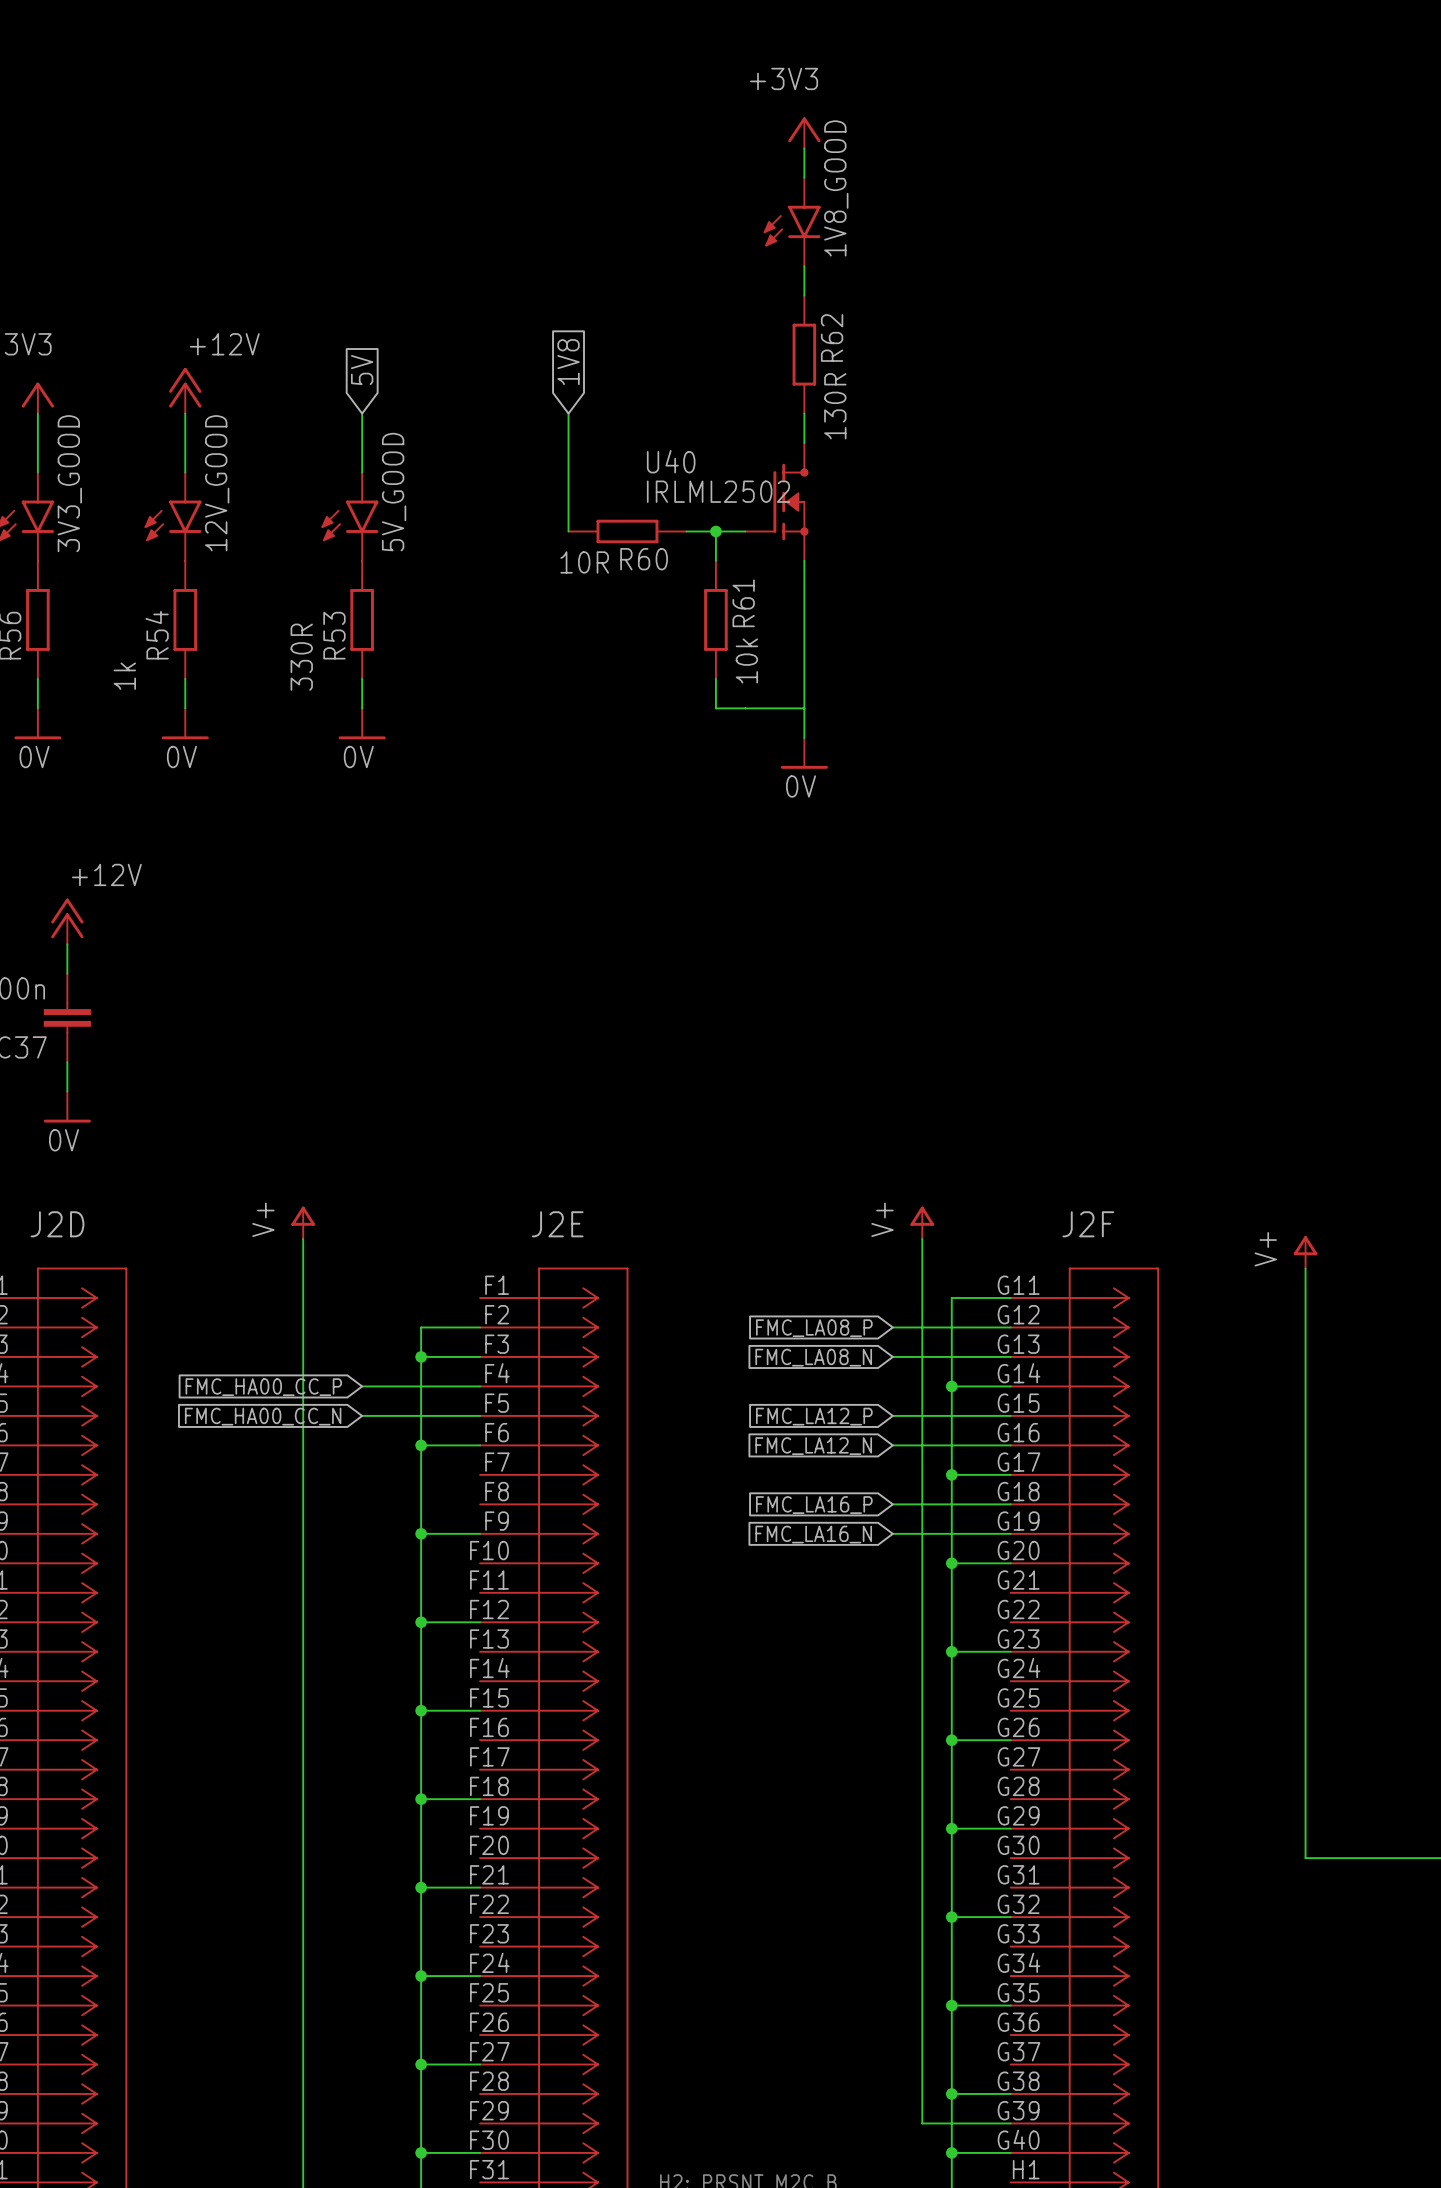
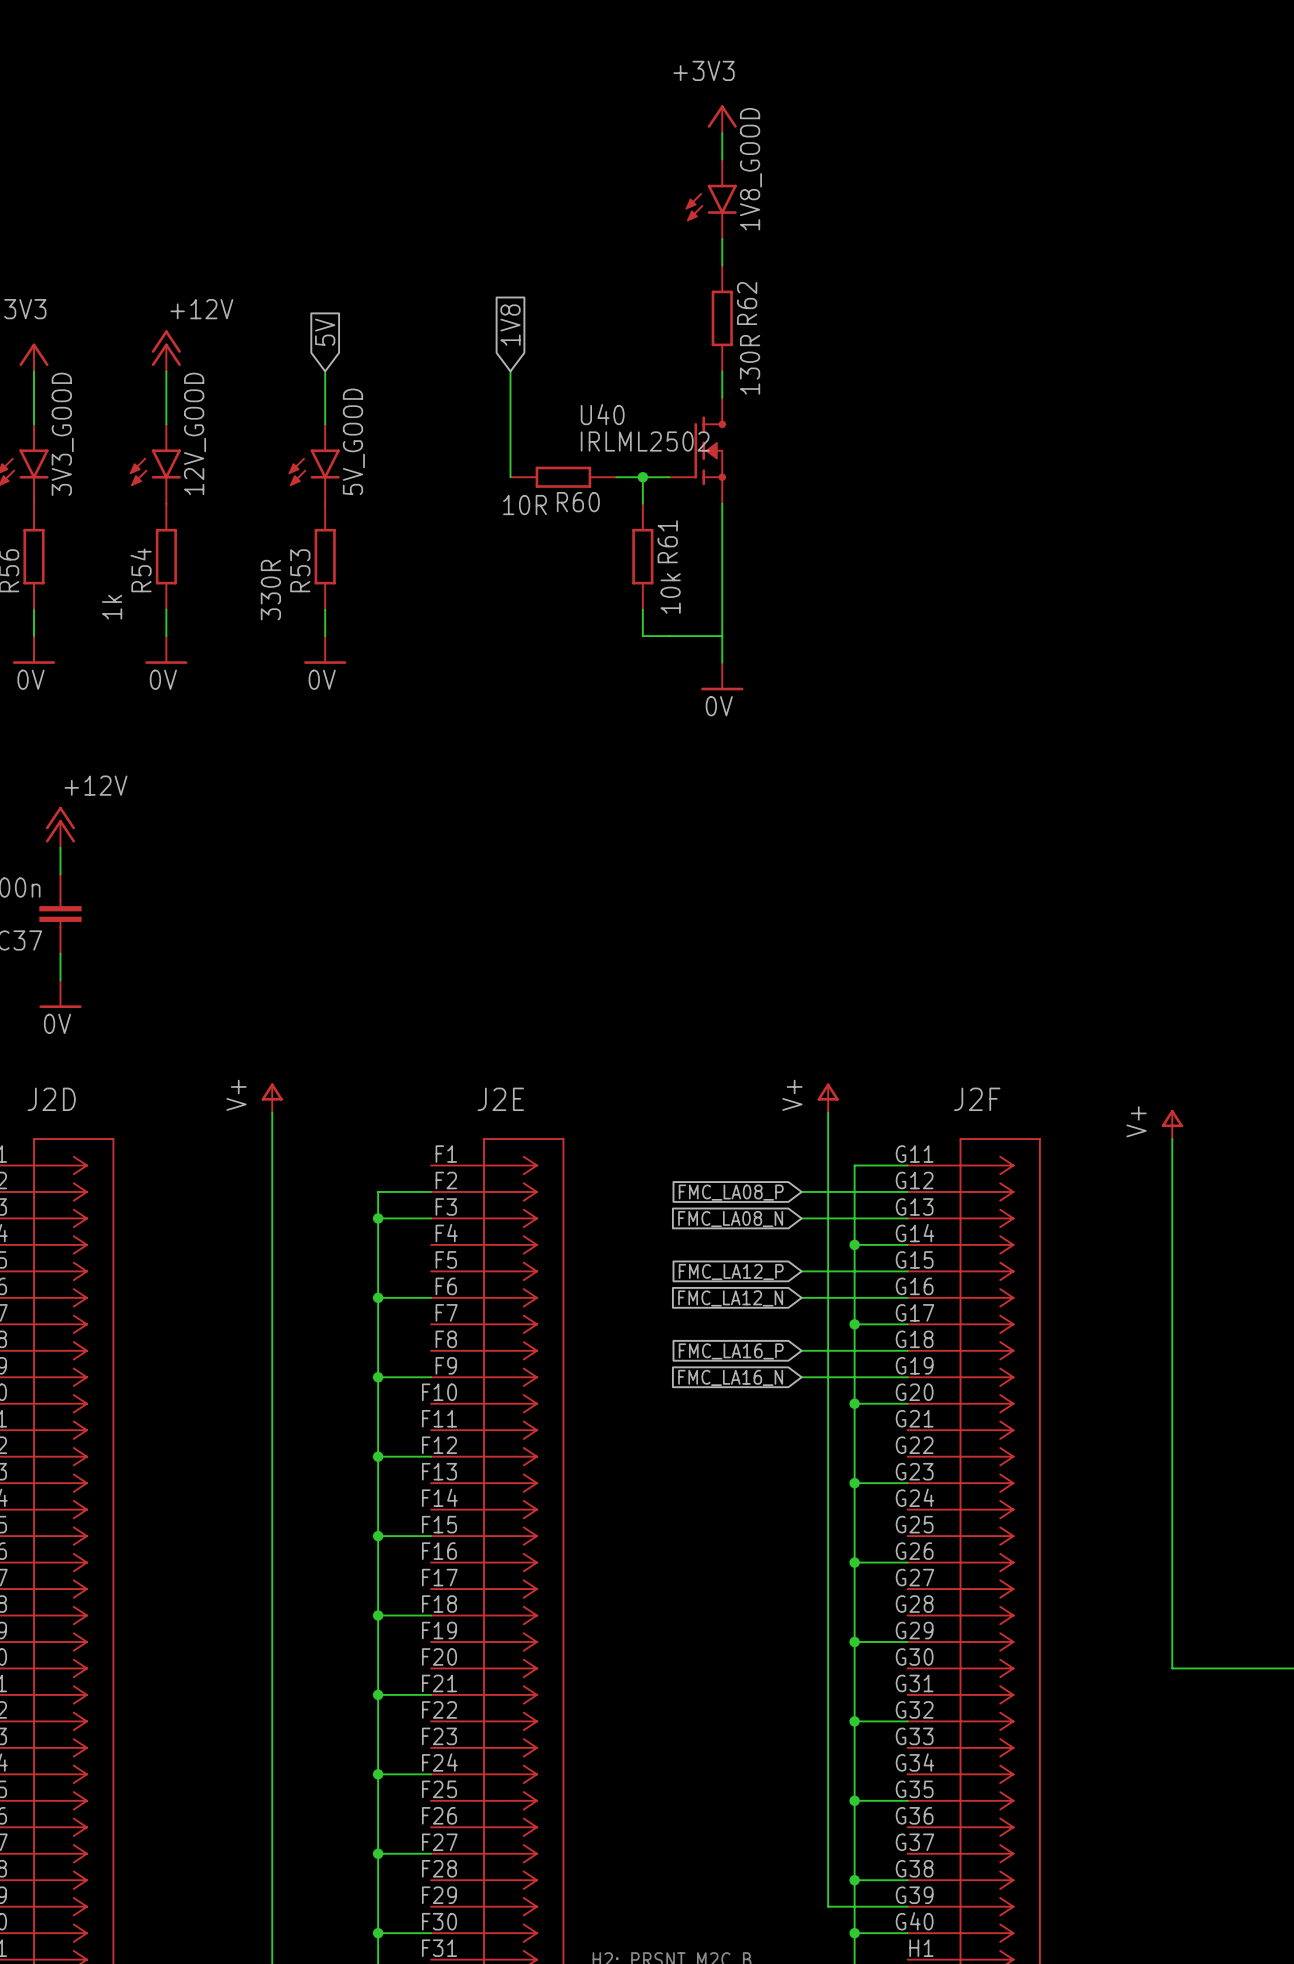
wire: (362, 1386) (480, 1386) -> none
global label: FMC_HA00_CC_P (263, 1387) -> none
wire: (362, 1415) (480, 1415) -> none
global label: FMC_HA00_CC_N (263, 1416) -> none

